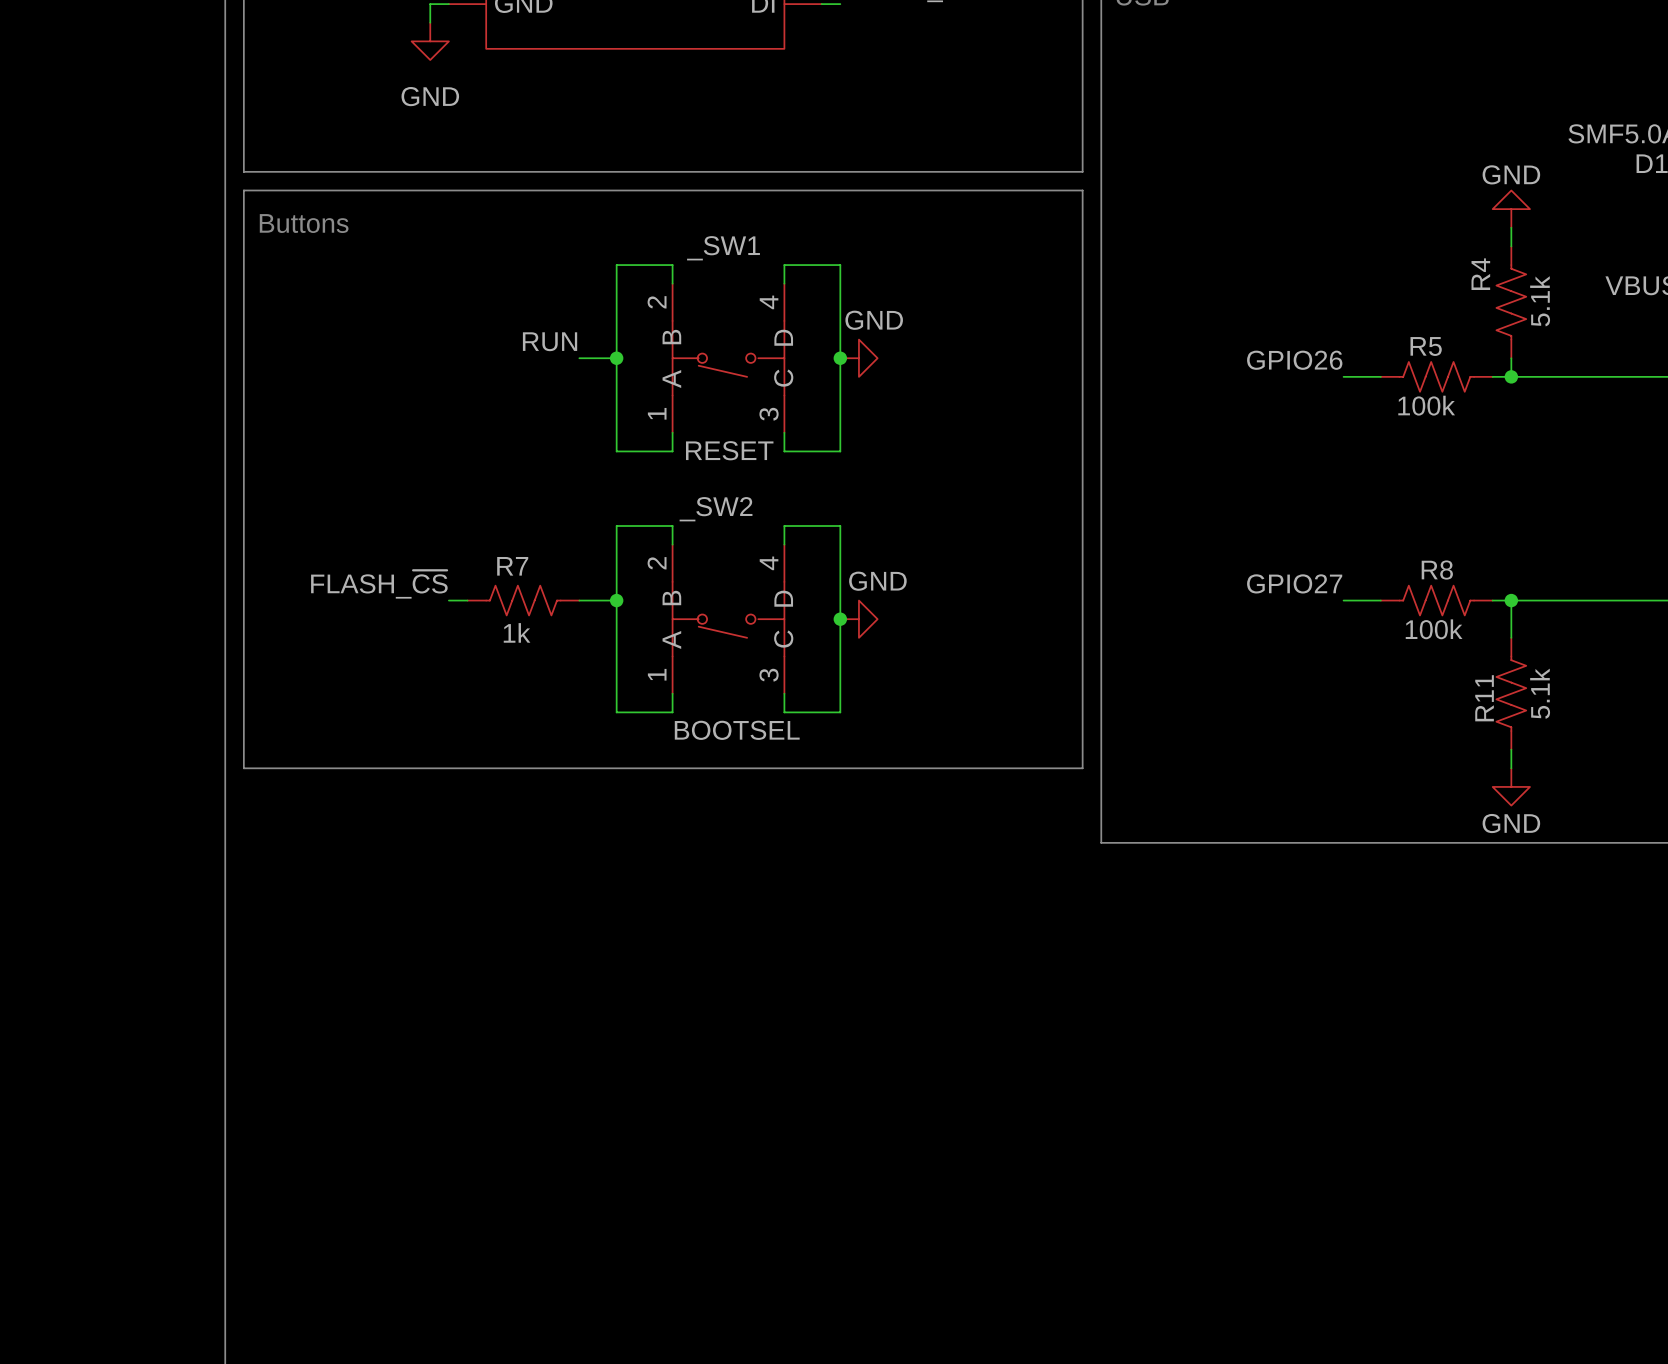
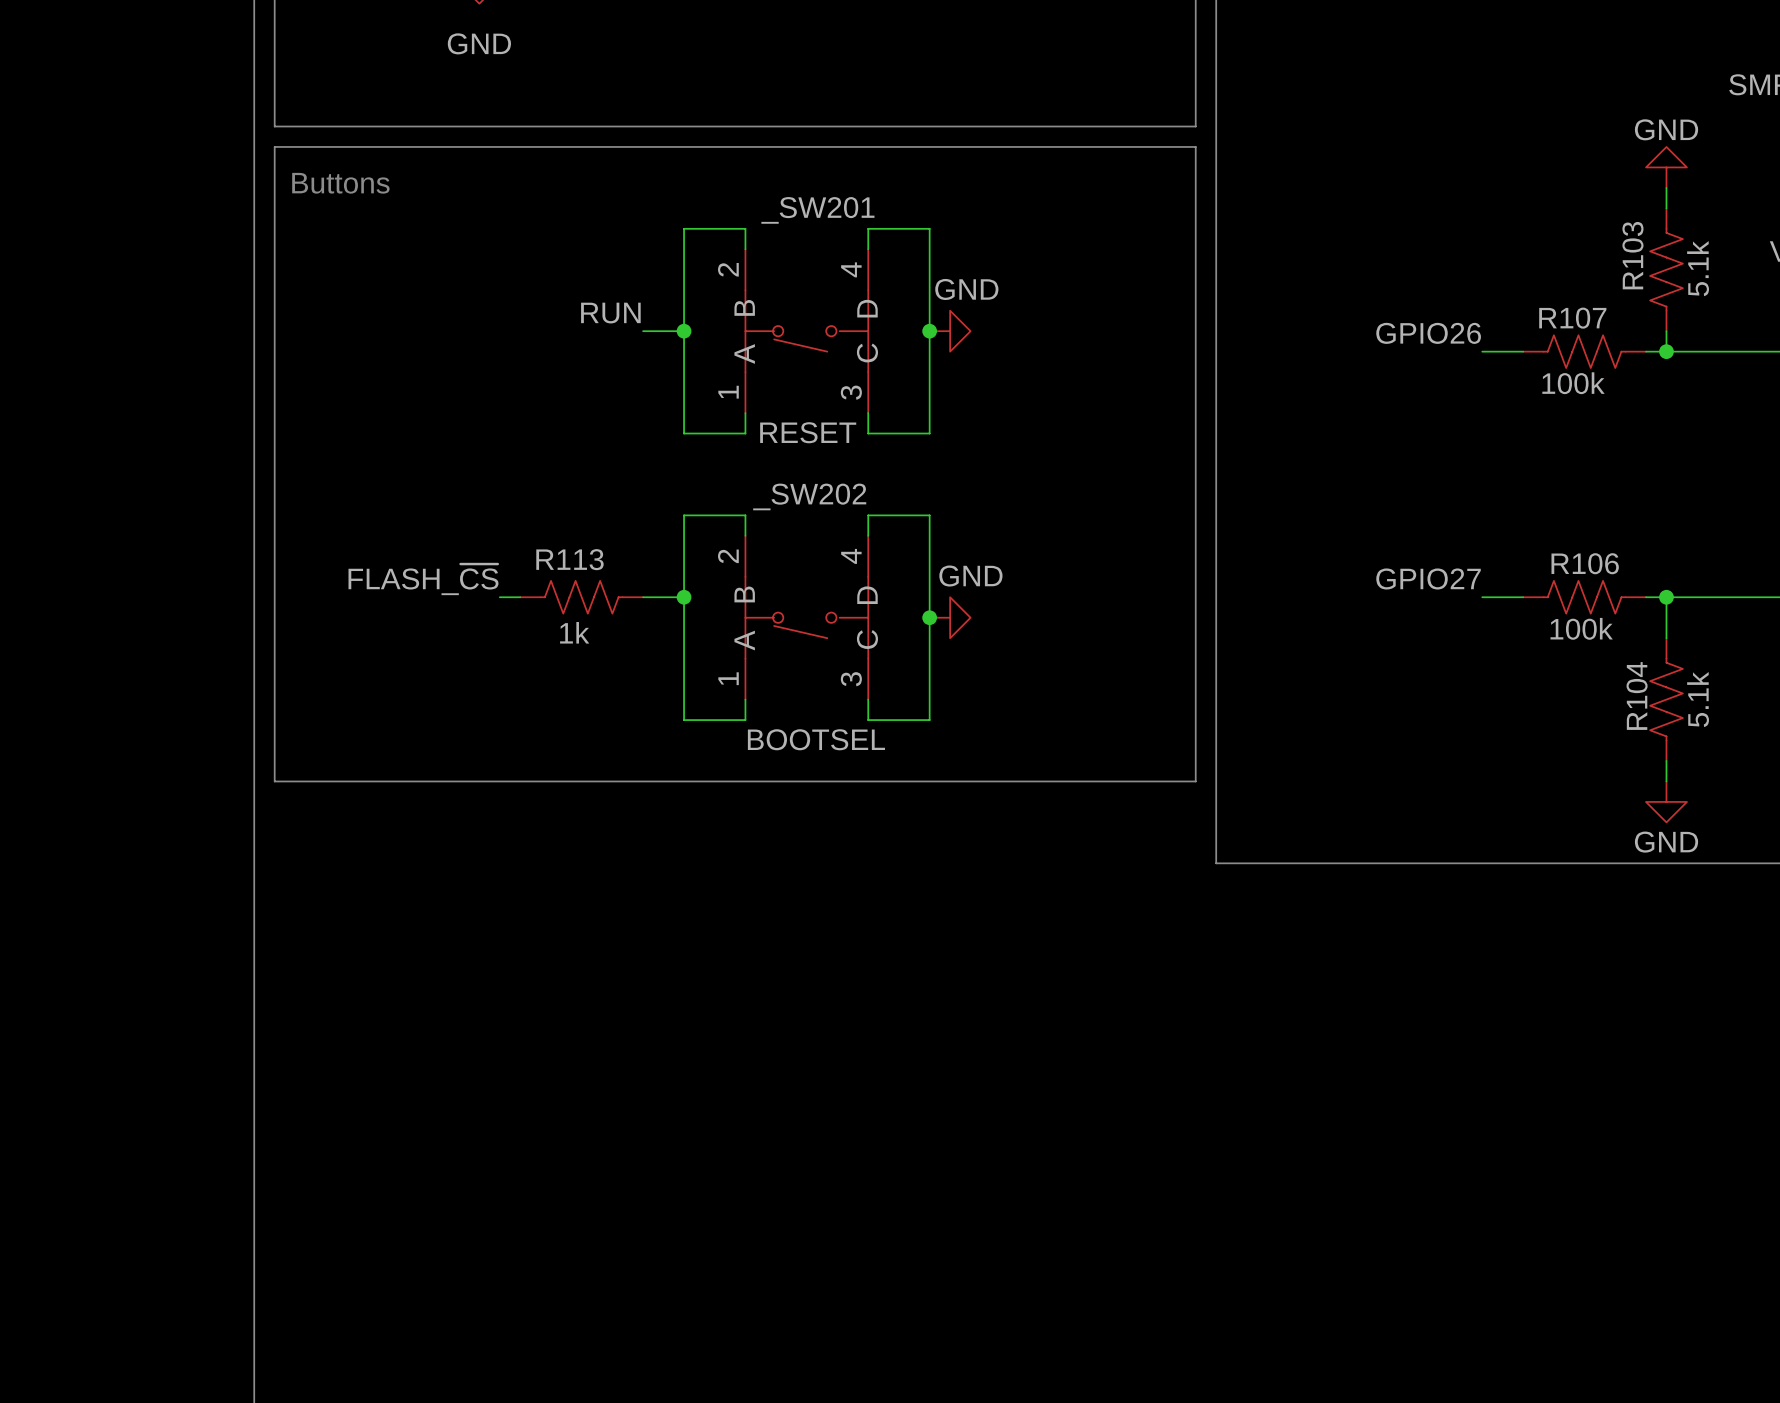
_SW1 name: _SW1 (723, 248) -> _SW201 (817, 210)
R4 name: R4 (1480, 274) -> R103 (1632, 255)
R5 name: R5 (1426, 346) -> R107 (1572, 318)
_SW2 name: _SW2 (716, 509) -> _SW202 (809, 496)
R7 name: R7 (512, 566) -> R113 (569, 559)
R8 name: R8 (1437, 570) -> R106 (1585, 563)
R11 name: R11 (1484, 698) -> R104 (1637, 695)

